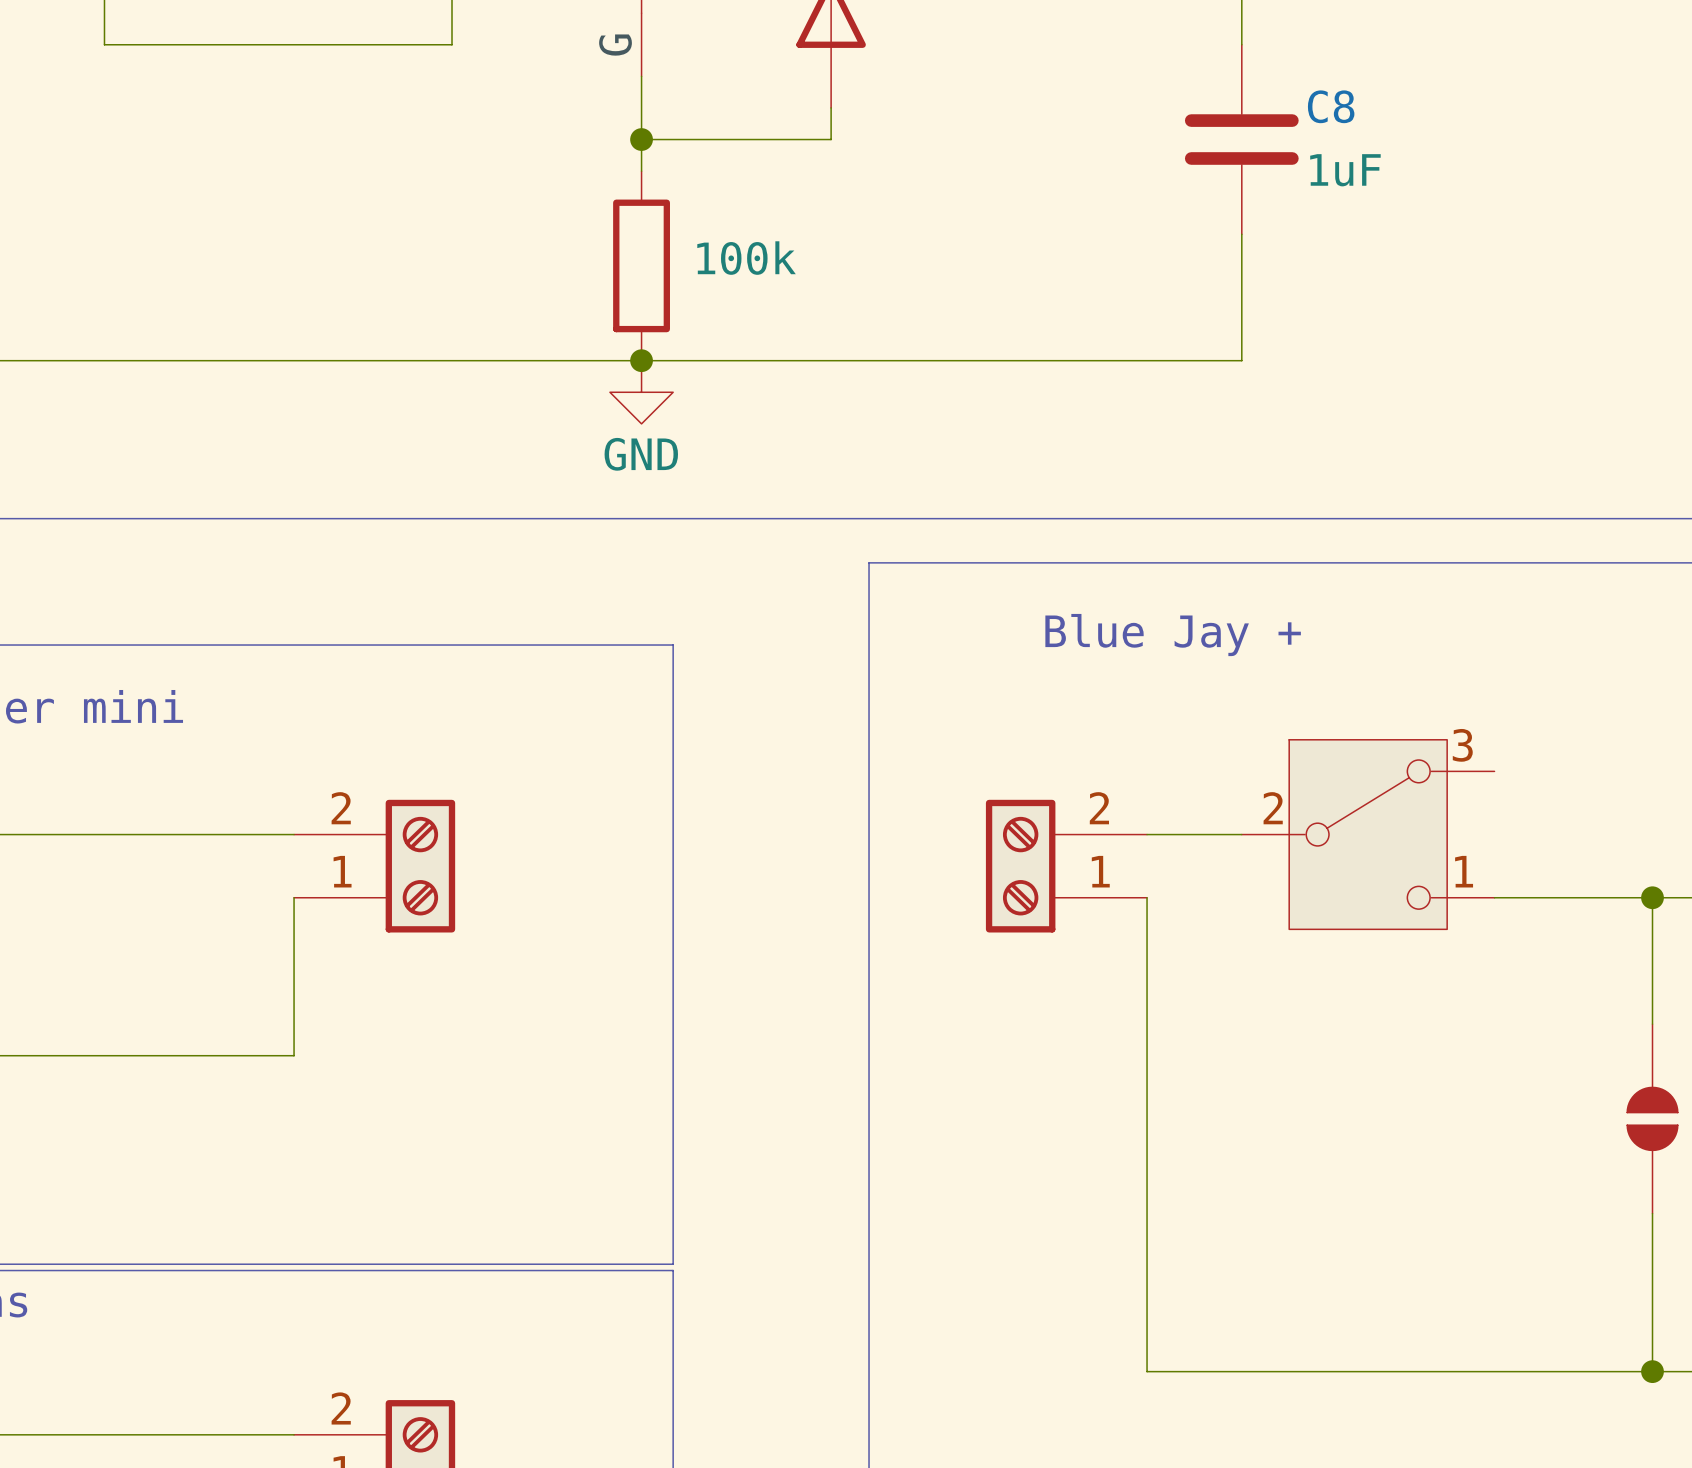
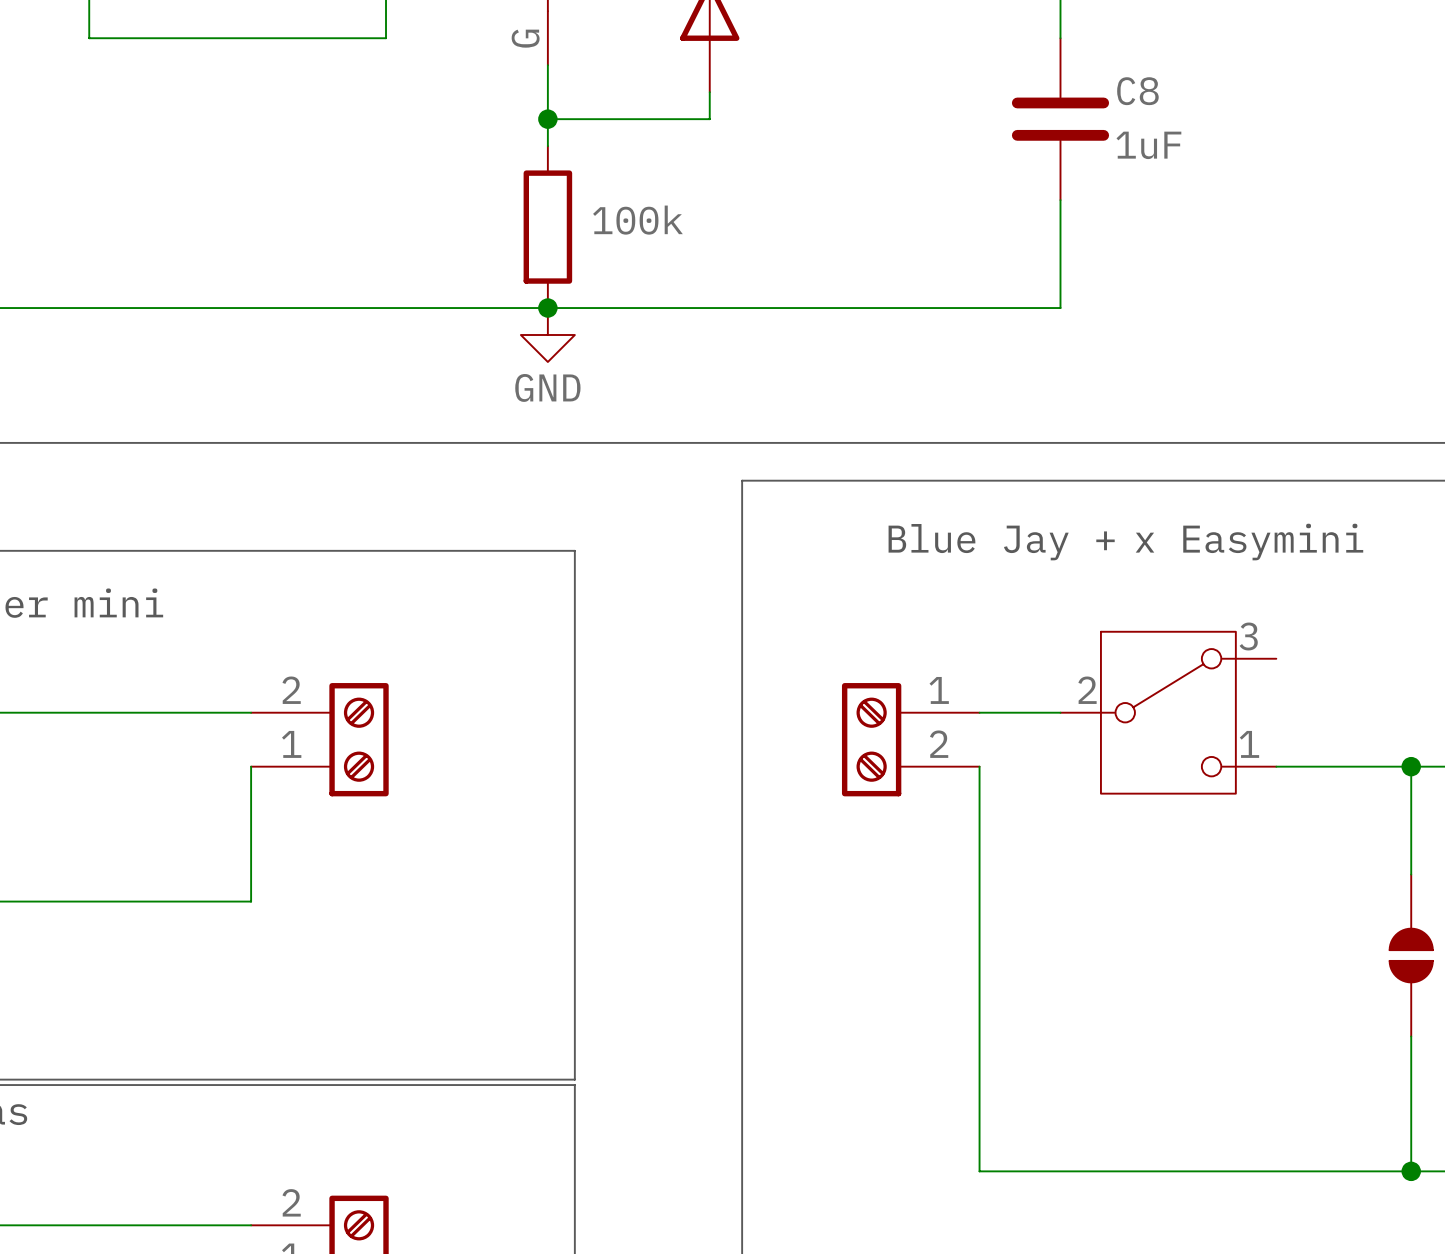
text: none -> x Easymini (1249, 542)
part pin number: 2 (1099, 808) -> 1 (939, 690)
part pin number: 1 (1100, 871) -> 2 (939, 744)

